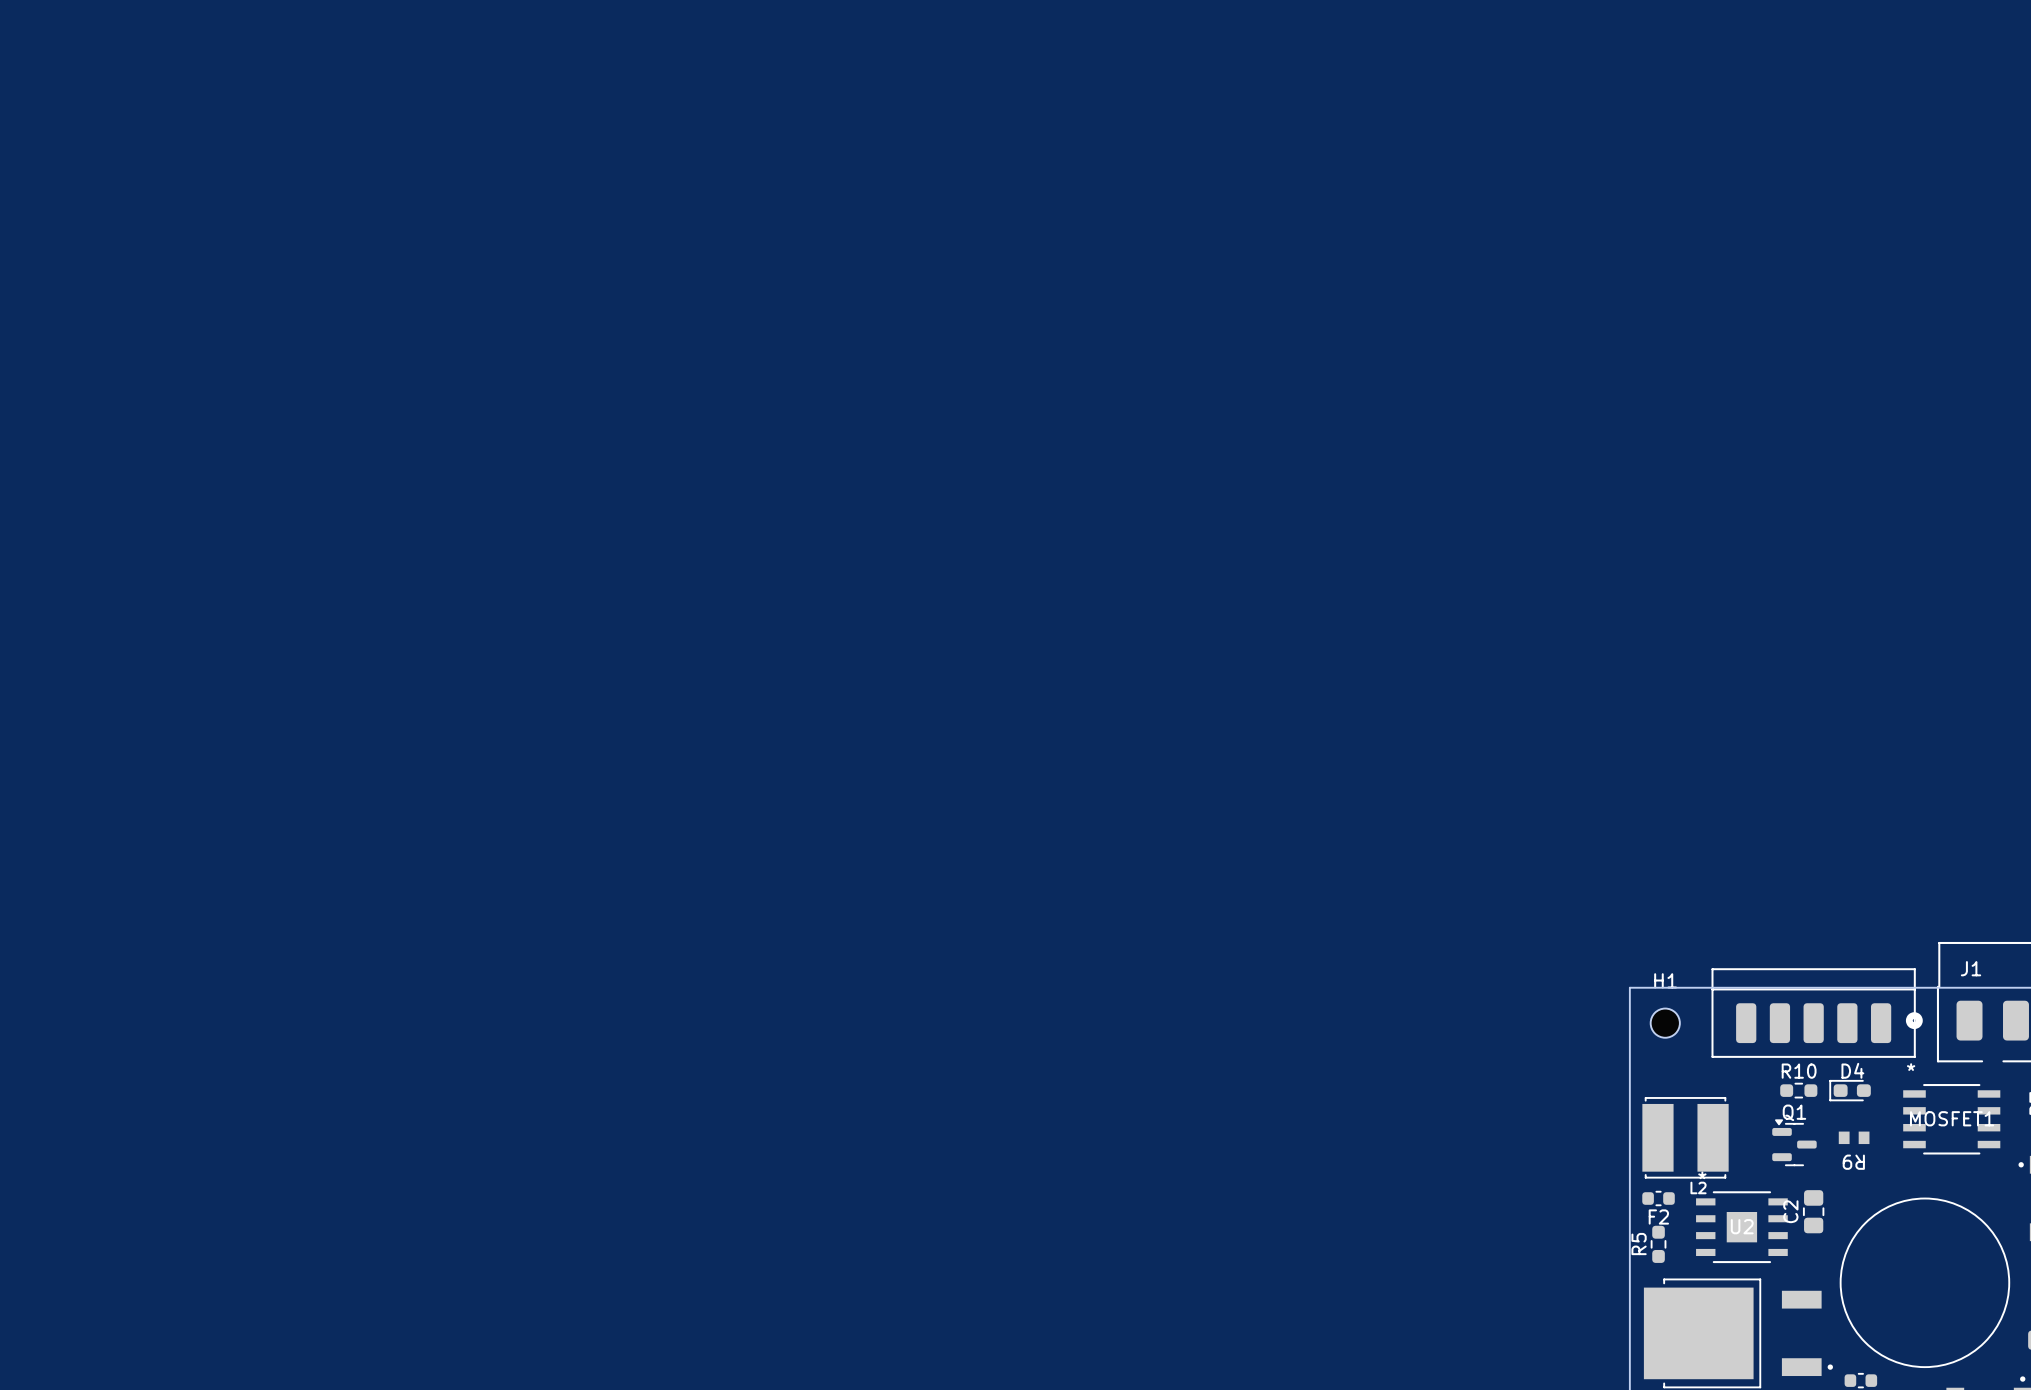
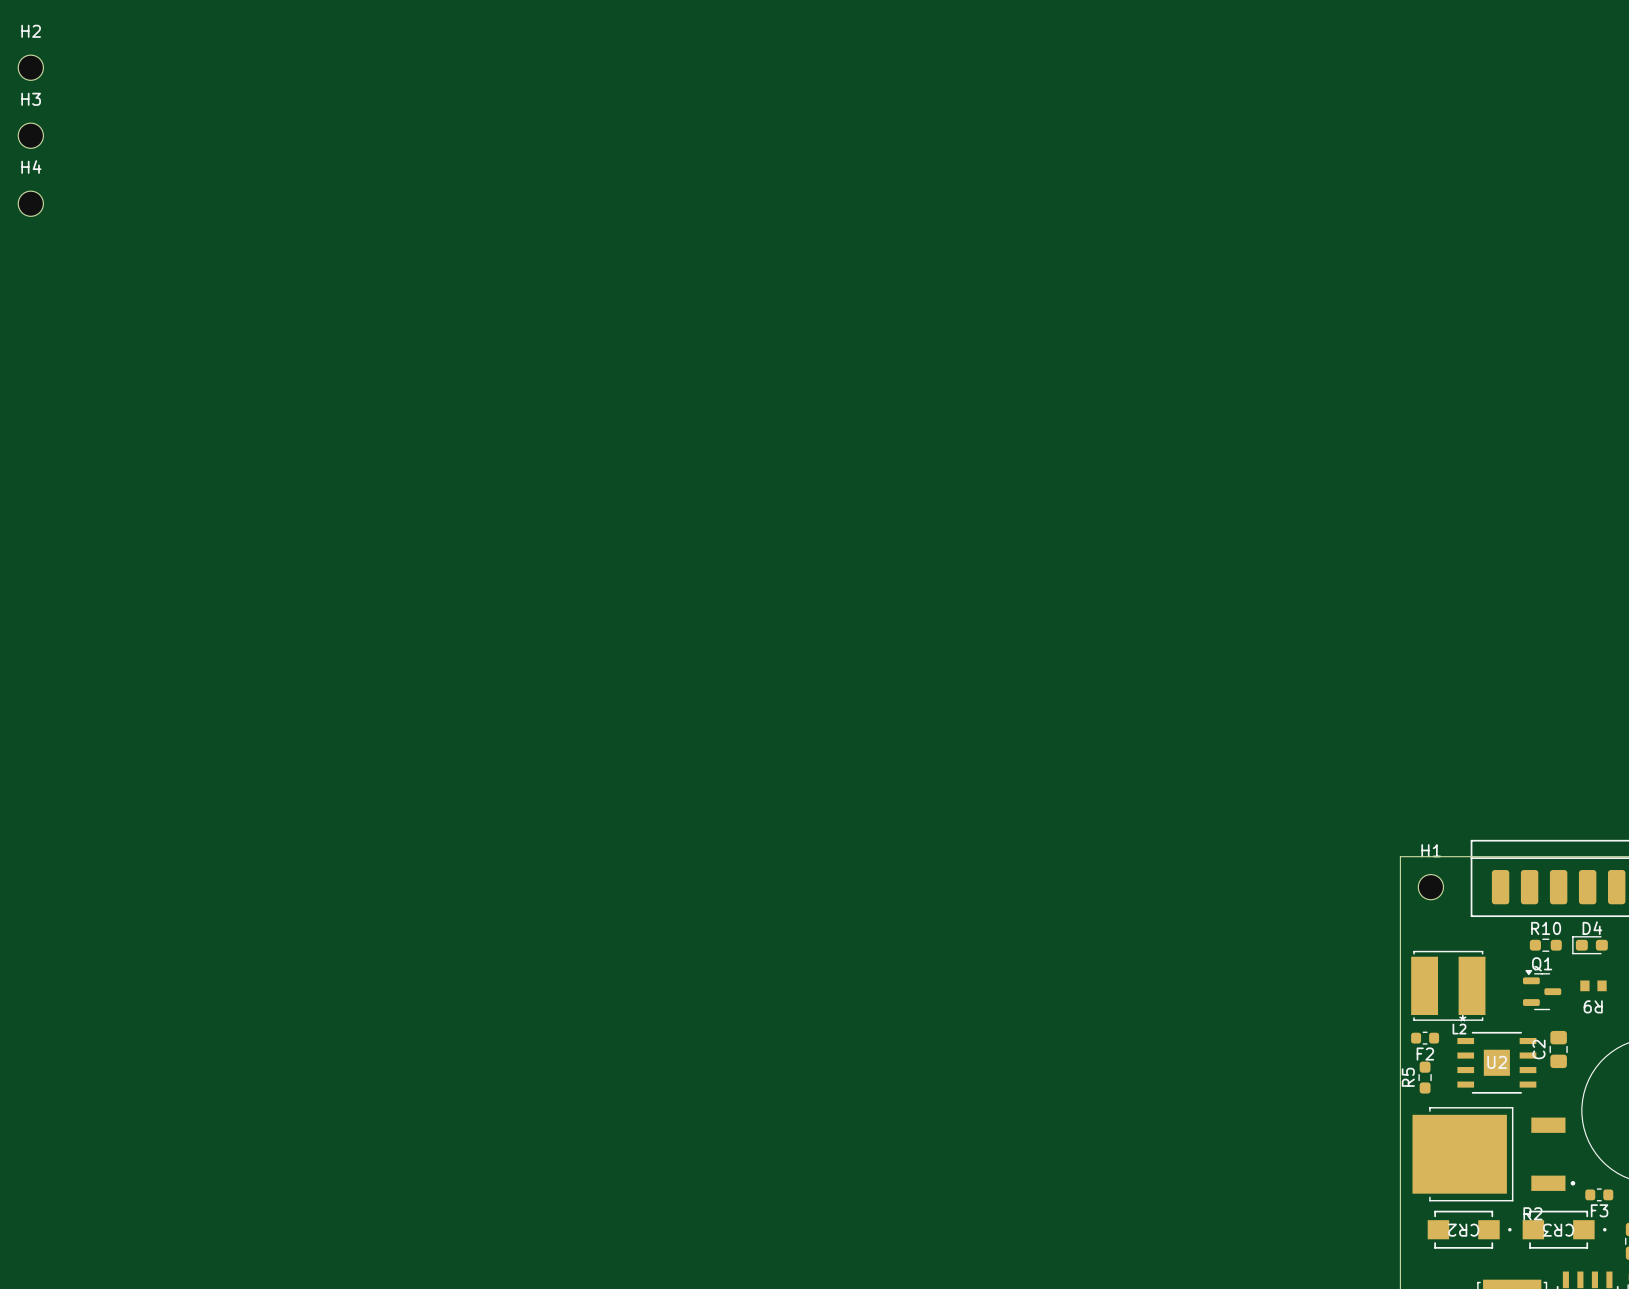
H2: none -> (30, 67)
H3: none -> (30, 135)
H4: none -> (30, 203)

